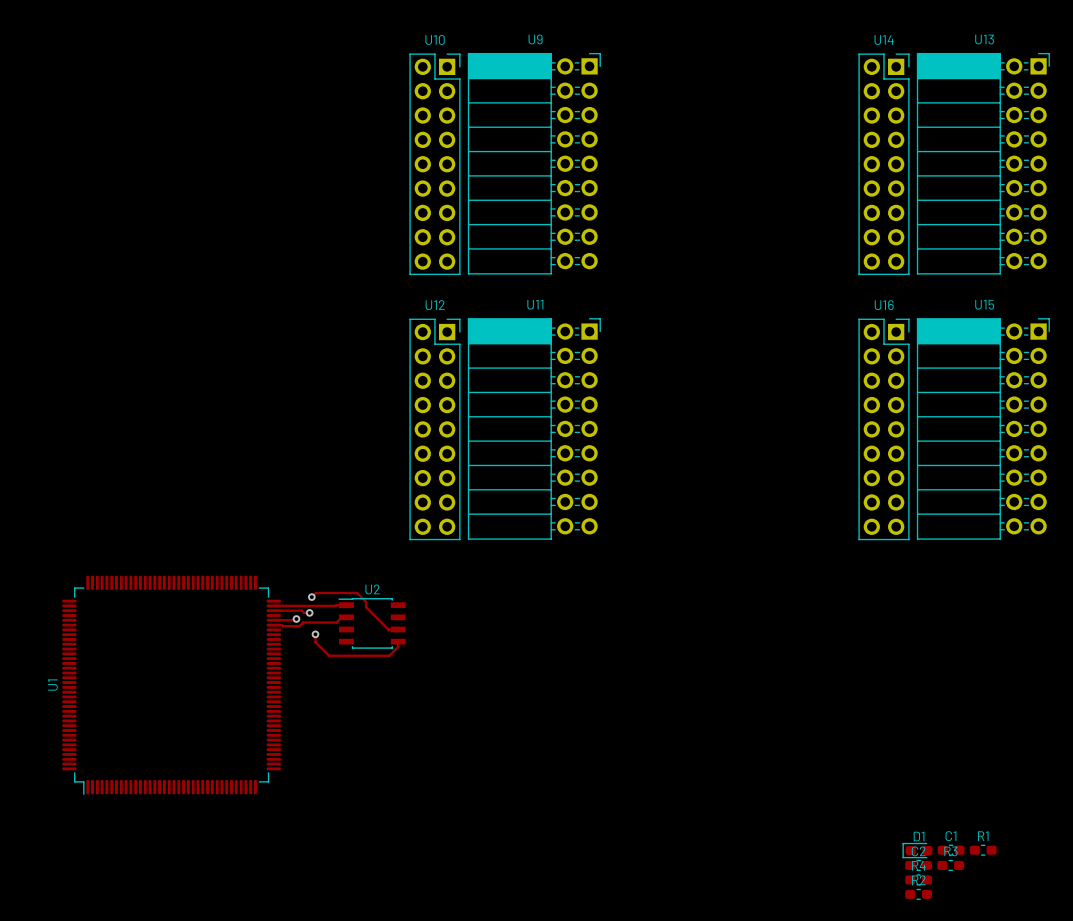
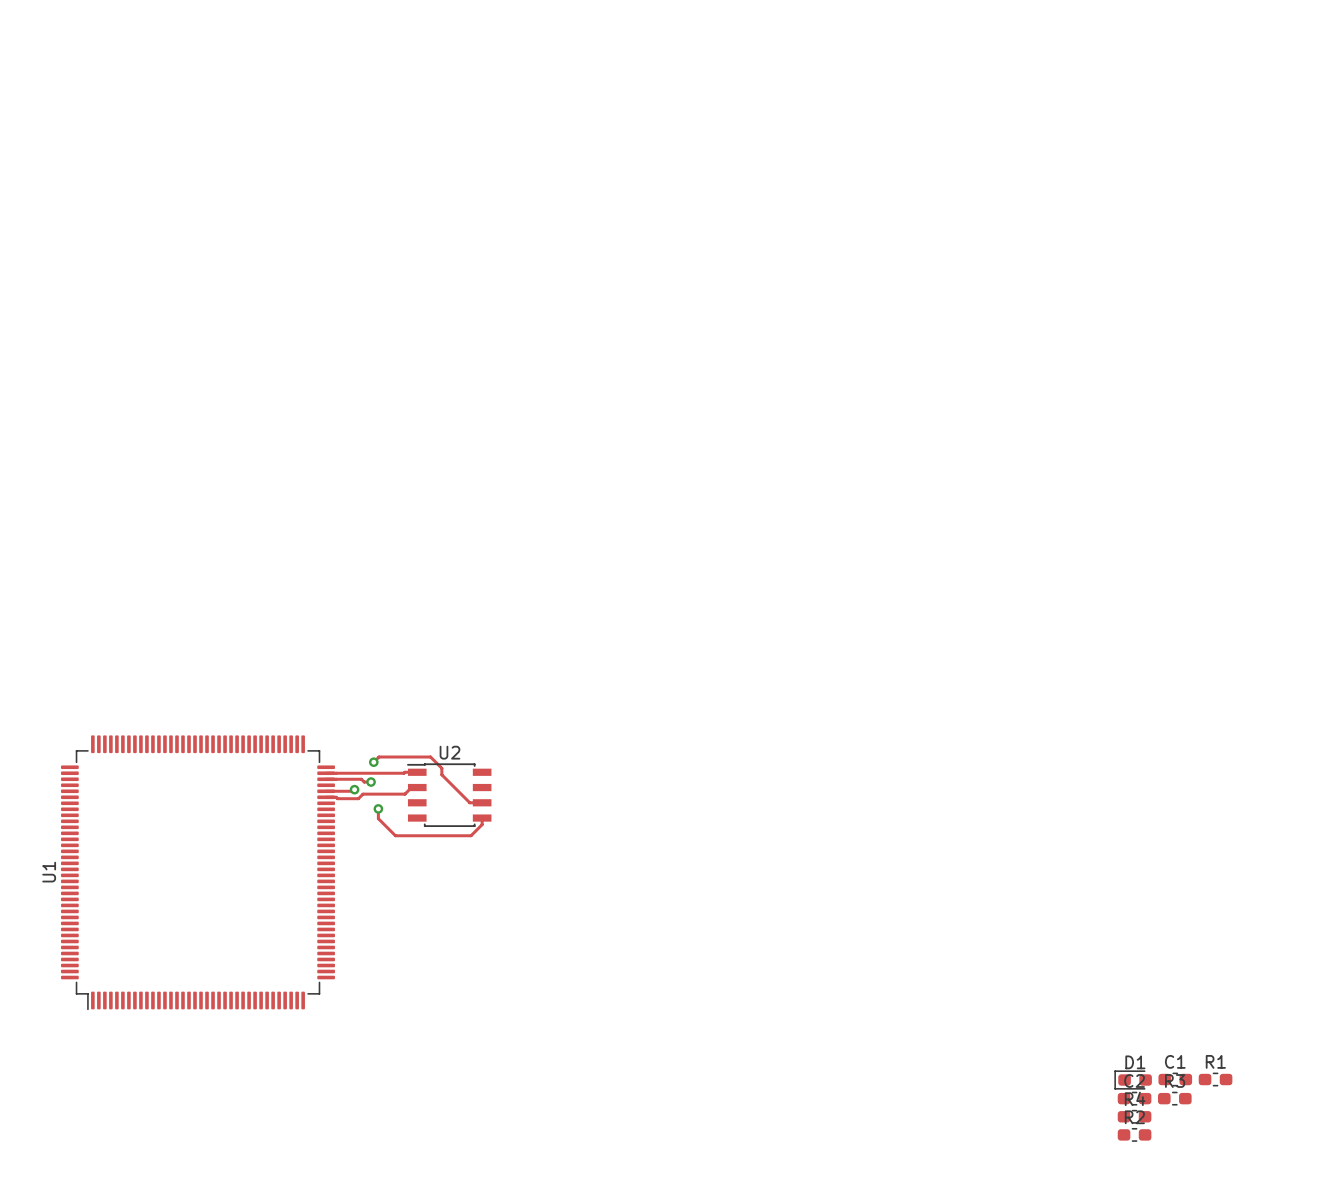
U9: (534, 163) -> none
U13: (983, 163) -> none
U10: (434, 164) -> none
U14: (883, 164) -> none
U11: (534, 428) -> none
U15: (983, 428) -> none
U12: (434, 429) -> none
U16: (883, 429) -> none

